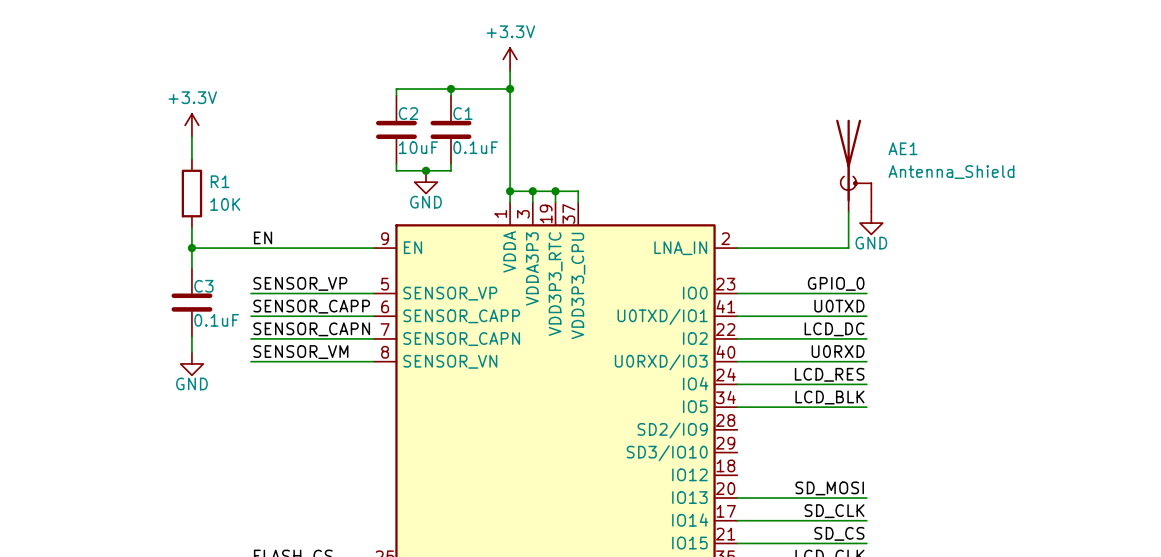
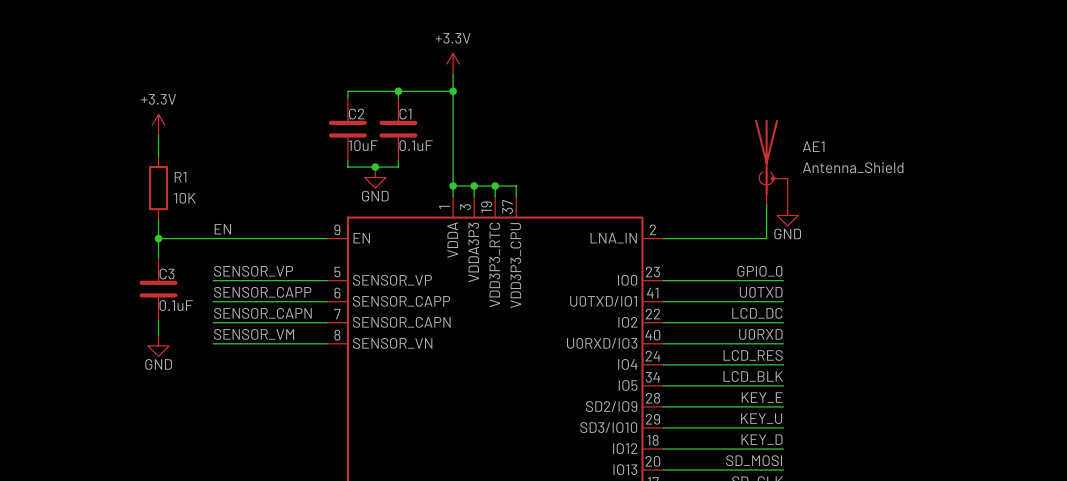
label: none -> KEY_E (762, 397)
wire: none -> (663, 406) (783, 406)
label: none -> KEY_U (761, 418)
wire: none -> (663, 427) (783, 427)
label: none -> KEY_D (762, 439)
wire: none -> (663, 449) (783, 449)

